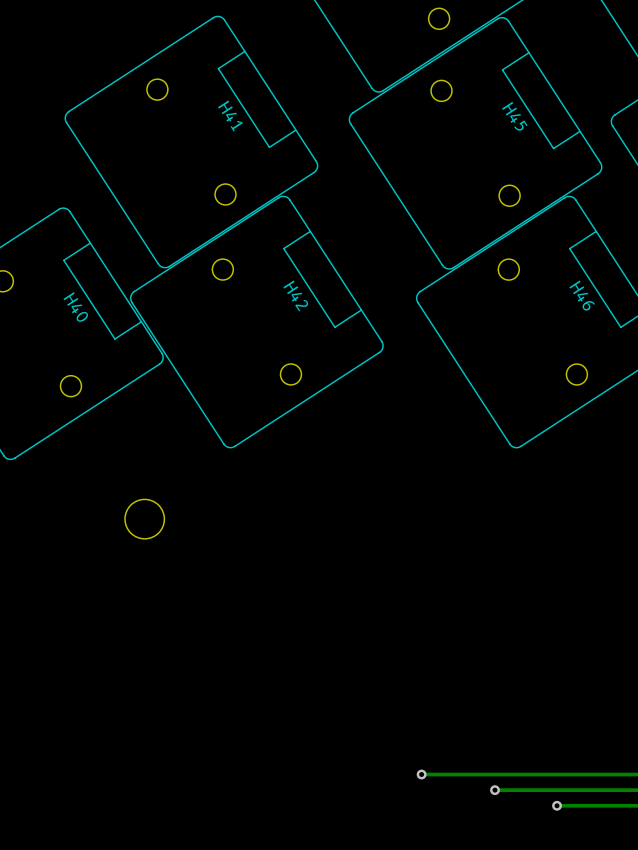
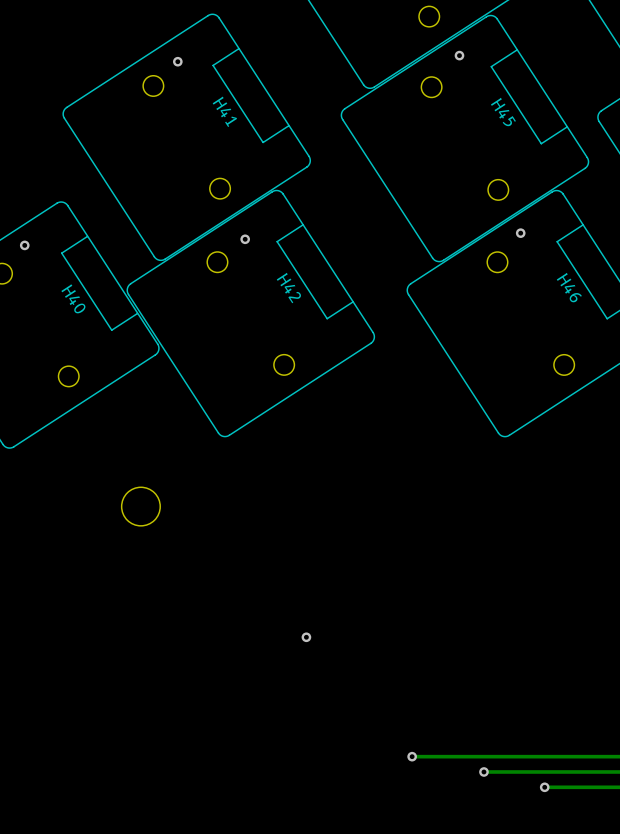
via: none -> (459, 55)
via: none -> (177, 61)
via: none -> (520, 233)
via: none -> (245, 239)
via: none -> (24, 245)
via: none -> (306, 637)

